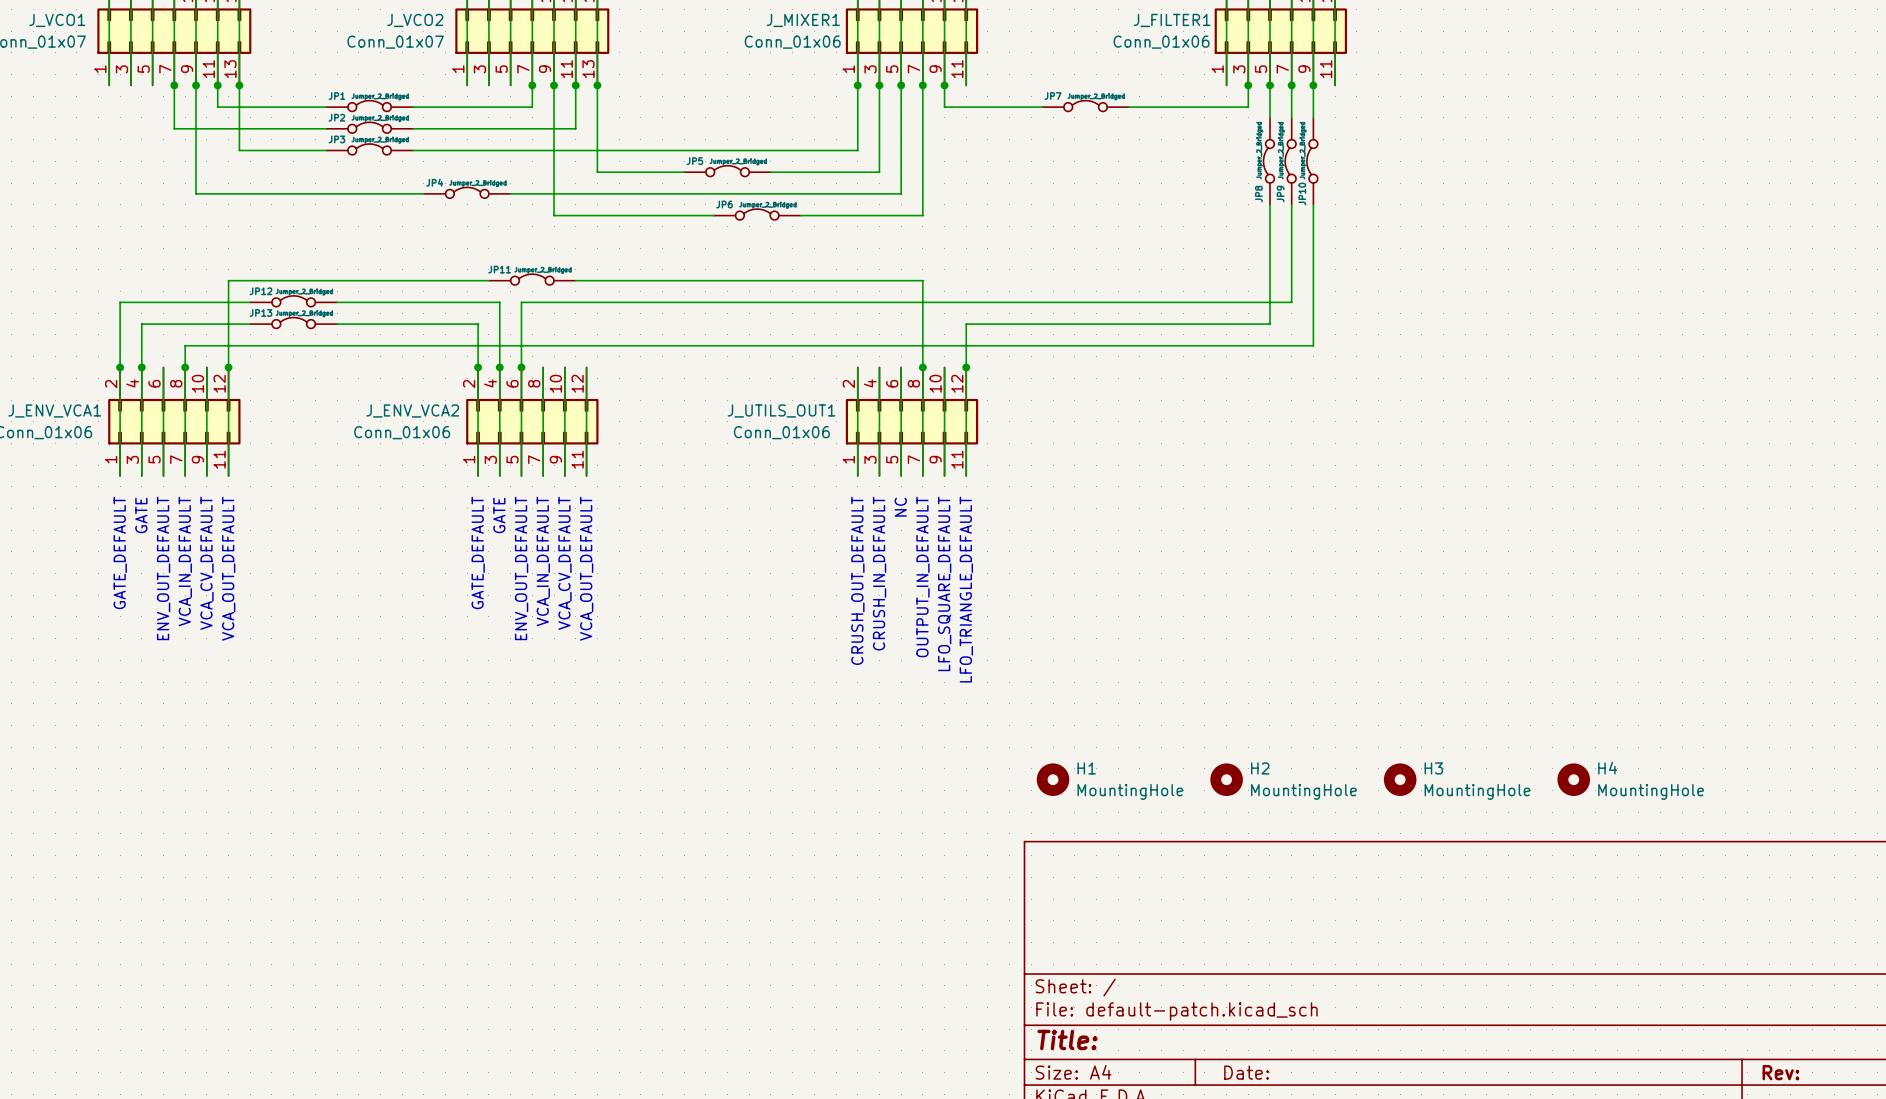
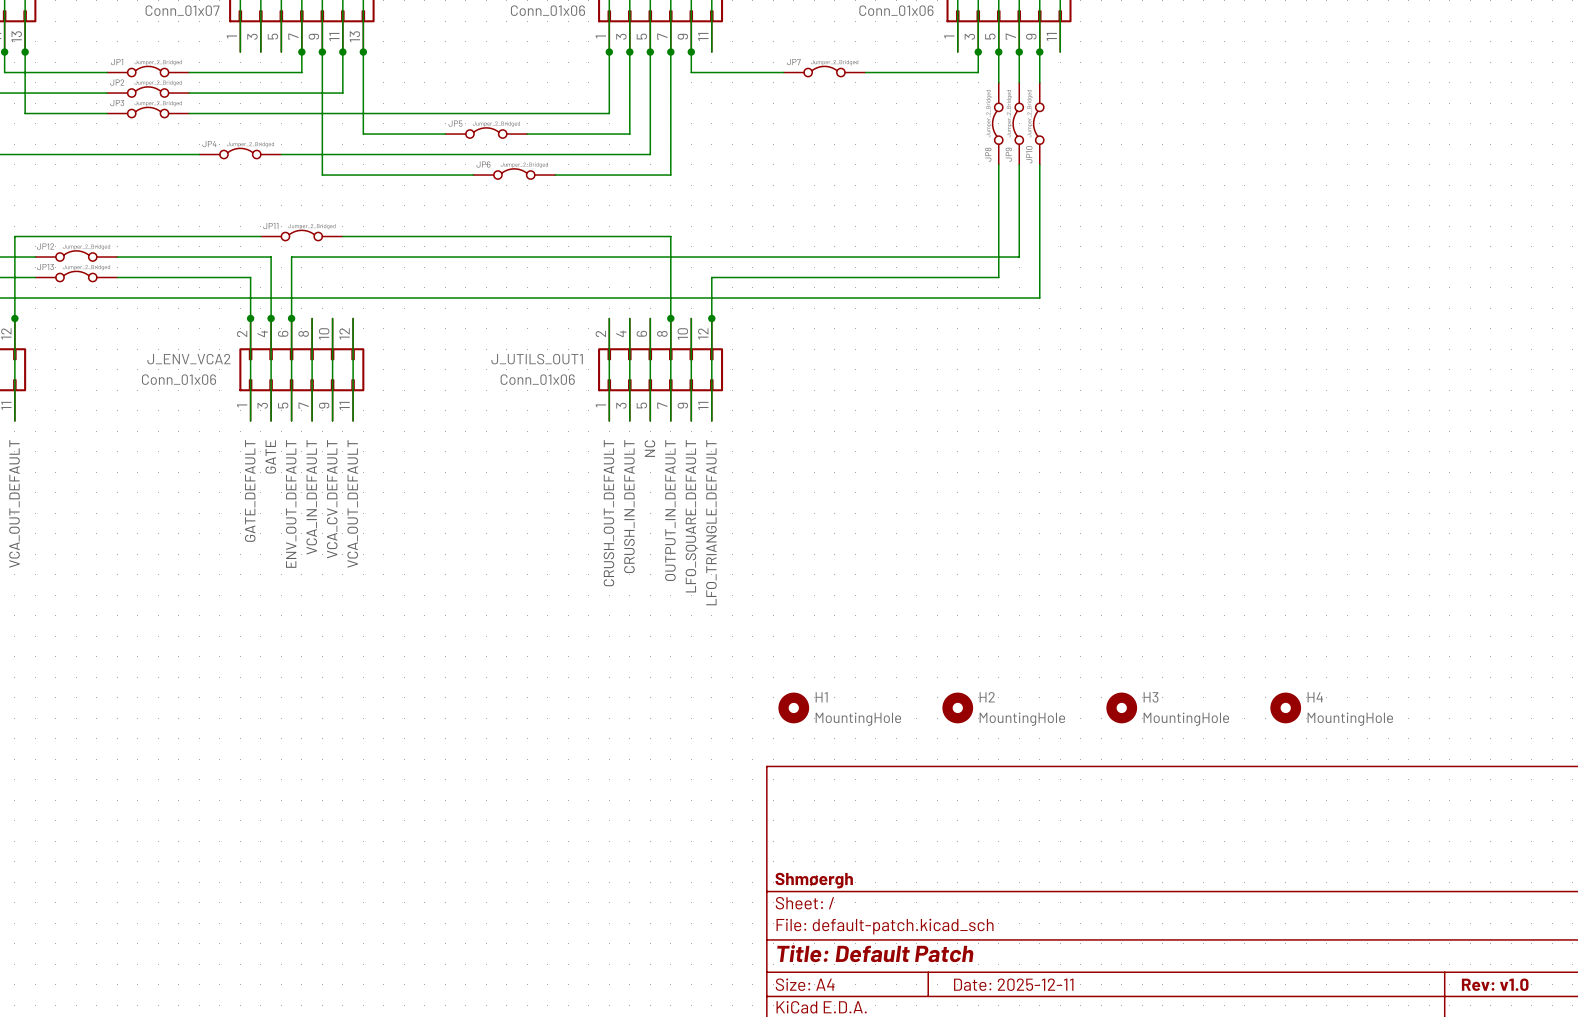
title block: none -> Shmøergh (814, 880)
title block: Title: (1067, 1040) -> Title: Default Patch (875, 953)
title block: Date: (1246, 1072) -> Date: 2025-12-11 (1013, 984)
title block: Rev: (1780, 1072) -> Rev: v1.0 (1495, 984)

